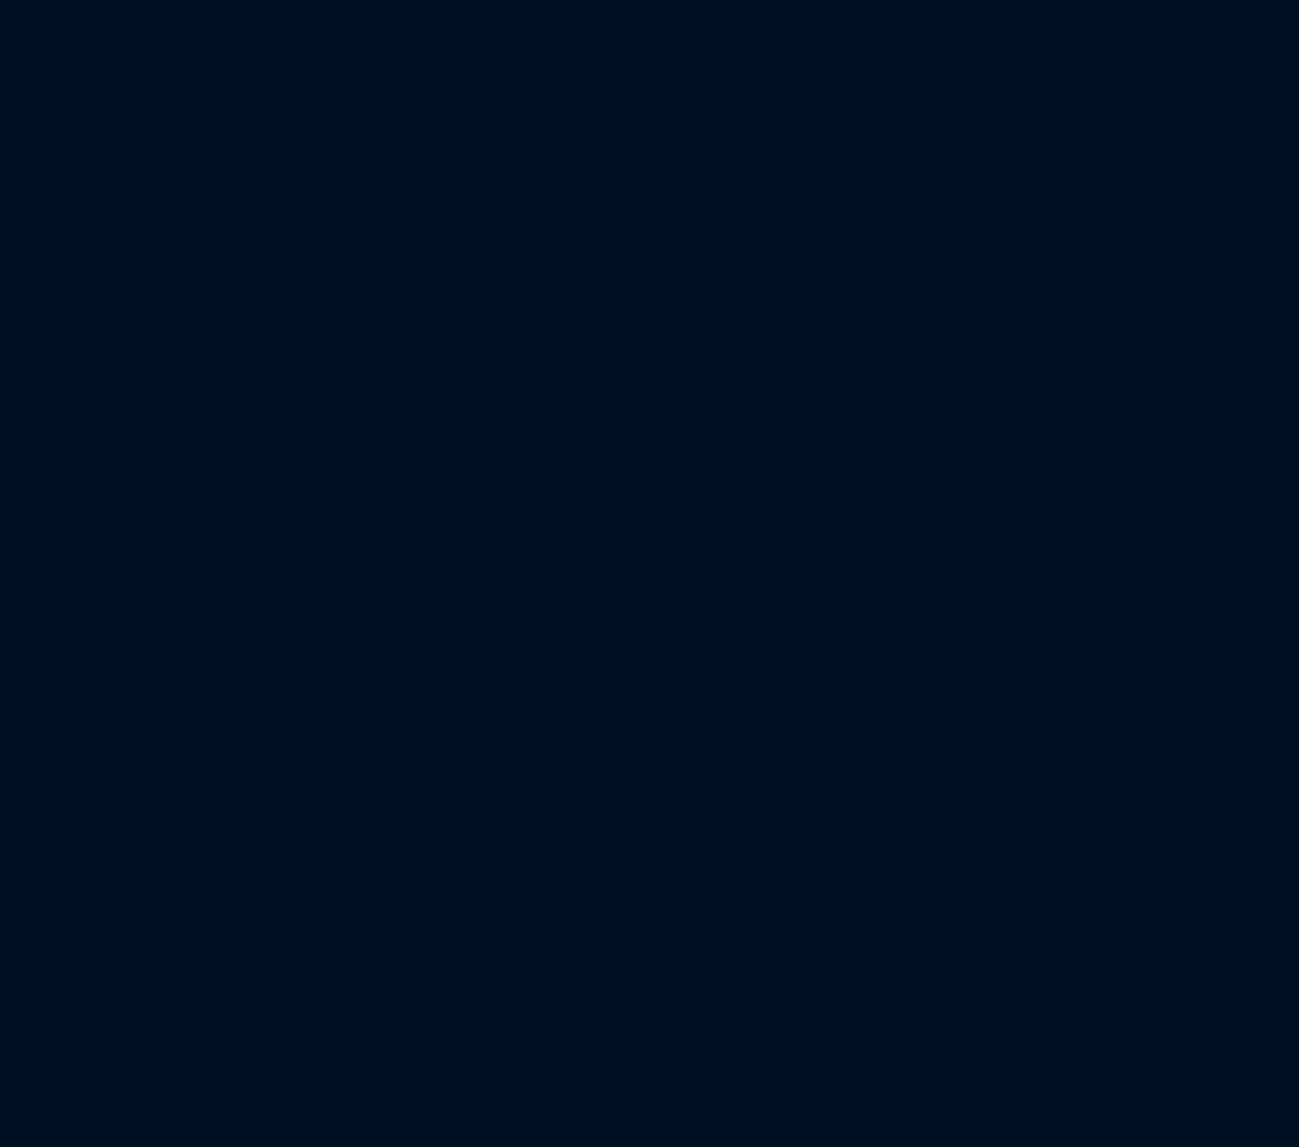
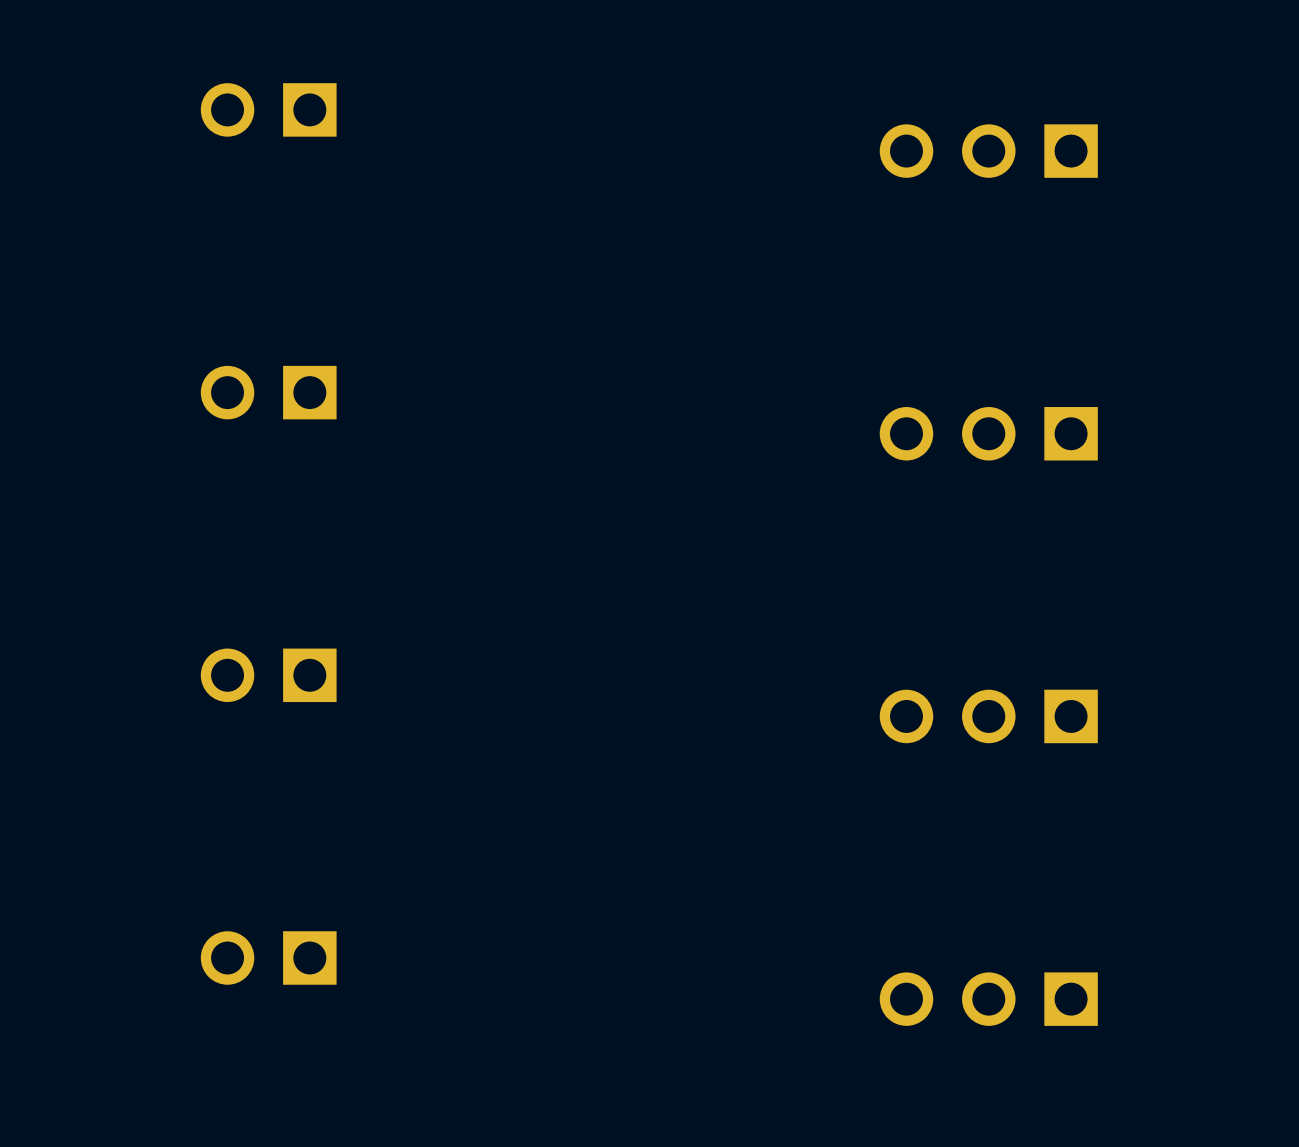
part: none -> (268, 109)
part: none -> (988, 151)
part: none -> (268, 392)
part: none -> (988, 433)
part: none -> (268, 675)
part: none -> (988, 716)
part: none -> (268, 957)
part: none -> (988, 999)

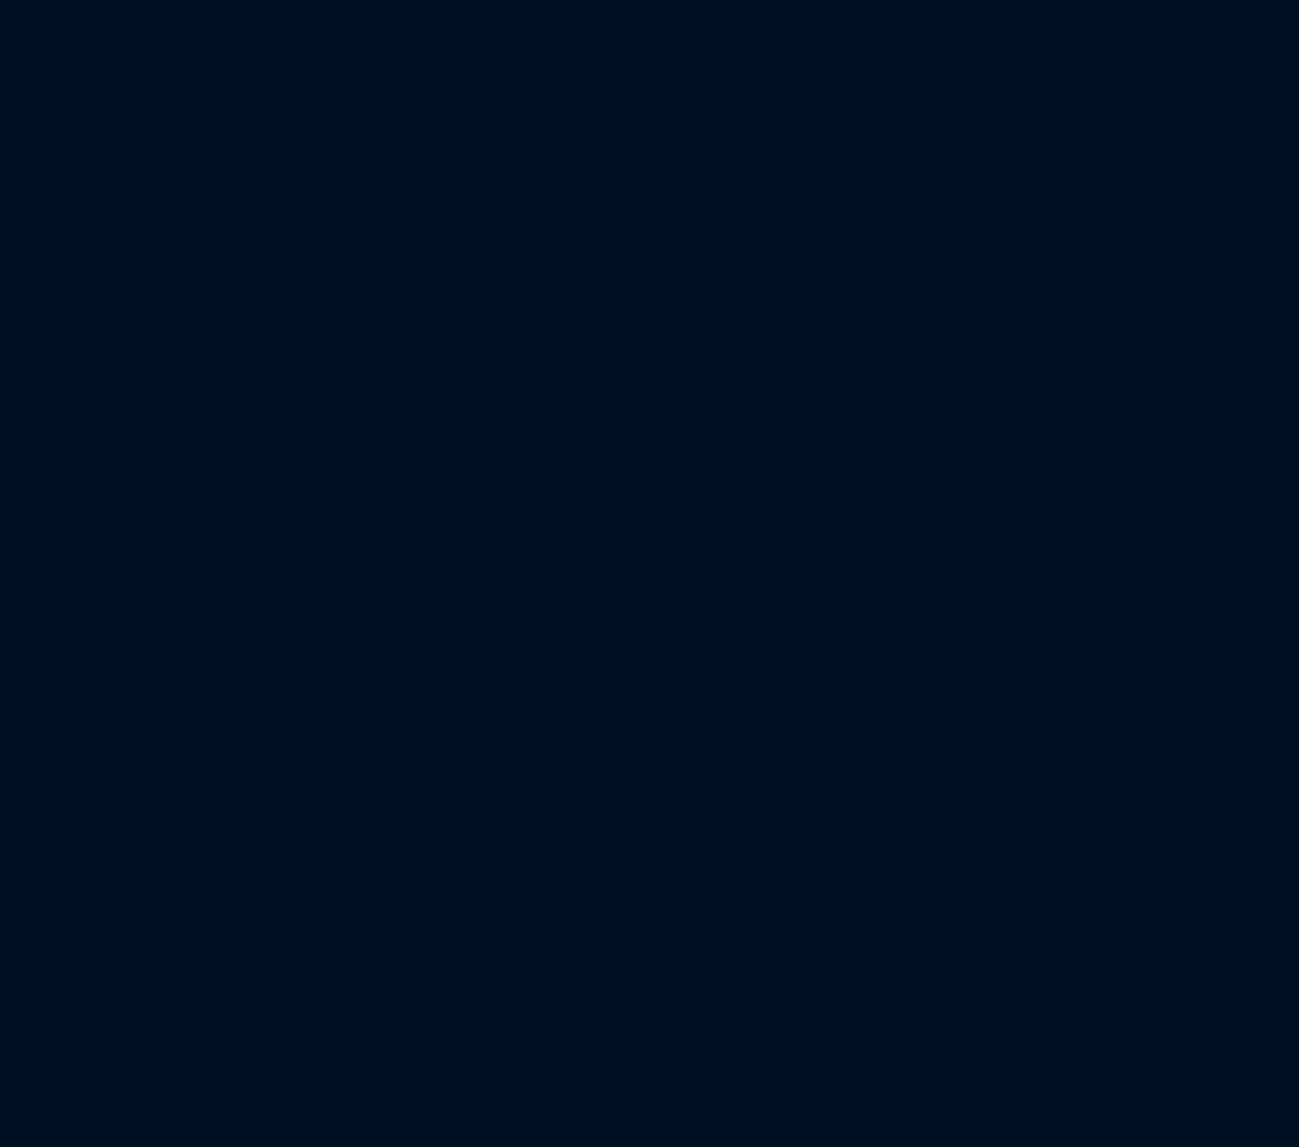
part: (268, 109) -> none
part: (988, 151) -> none
part: (268, 392) -> none
part: (988, 433) -> none
part: (268, 675) -> none
part: (988, 716) -> none
part: (268, 957) -> none
part: (988, 999) -> none

